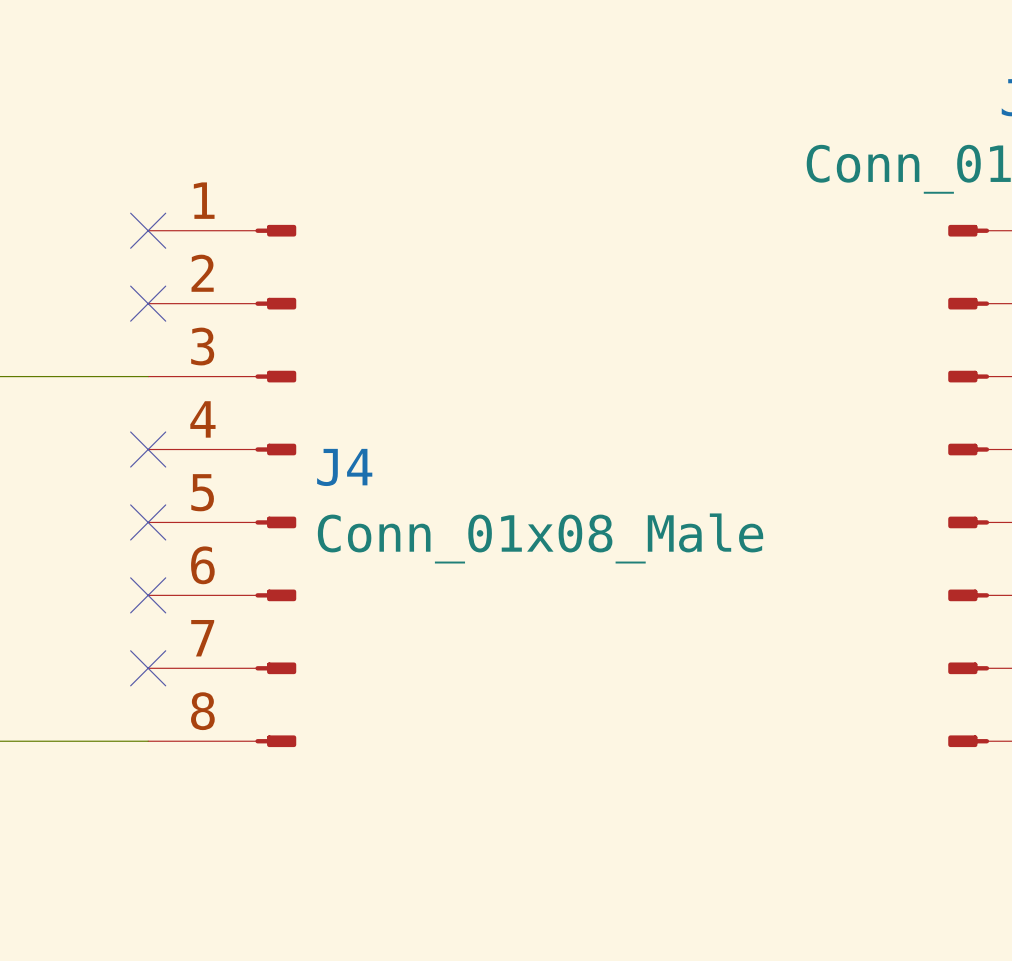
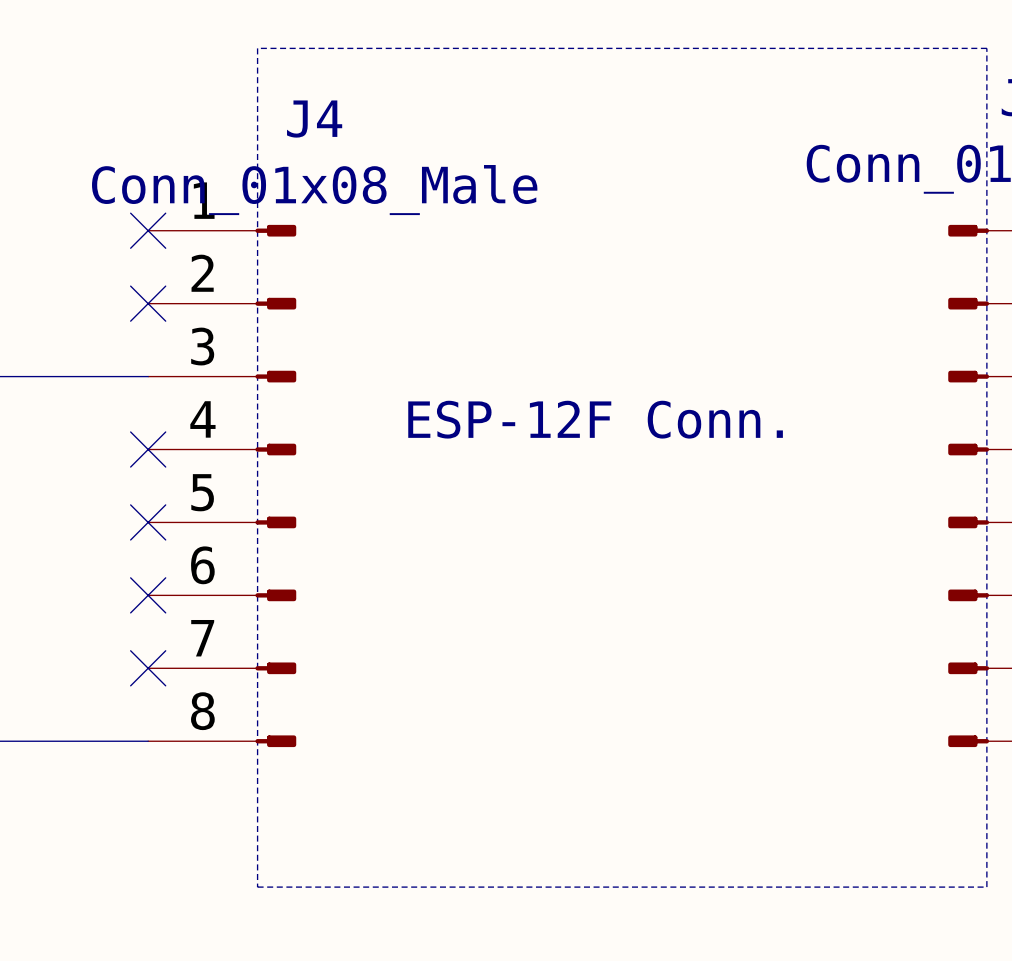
line: none -> (257, 48) (257, 887) (986, 887) (986, 48) (257, 48)
text: none -> ESP-12F Conn. (595, 419)
J4 name position: J4 (344, 467) -> J4 (314, 119)
J4 value position: Conn_01x08_Male (540, 538) -> Conn_01x08_Male (314, 190)

